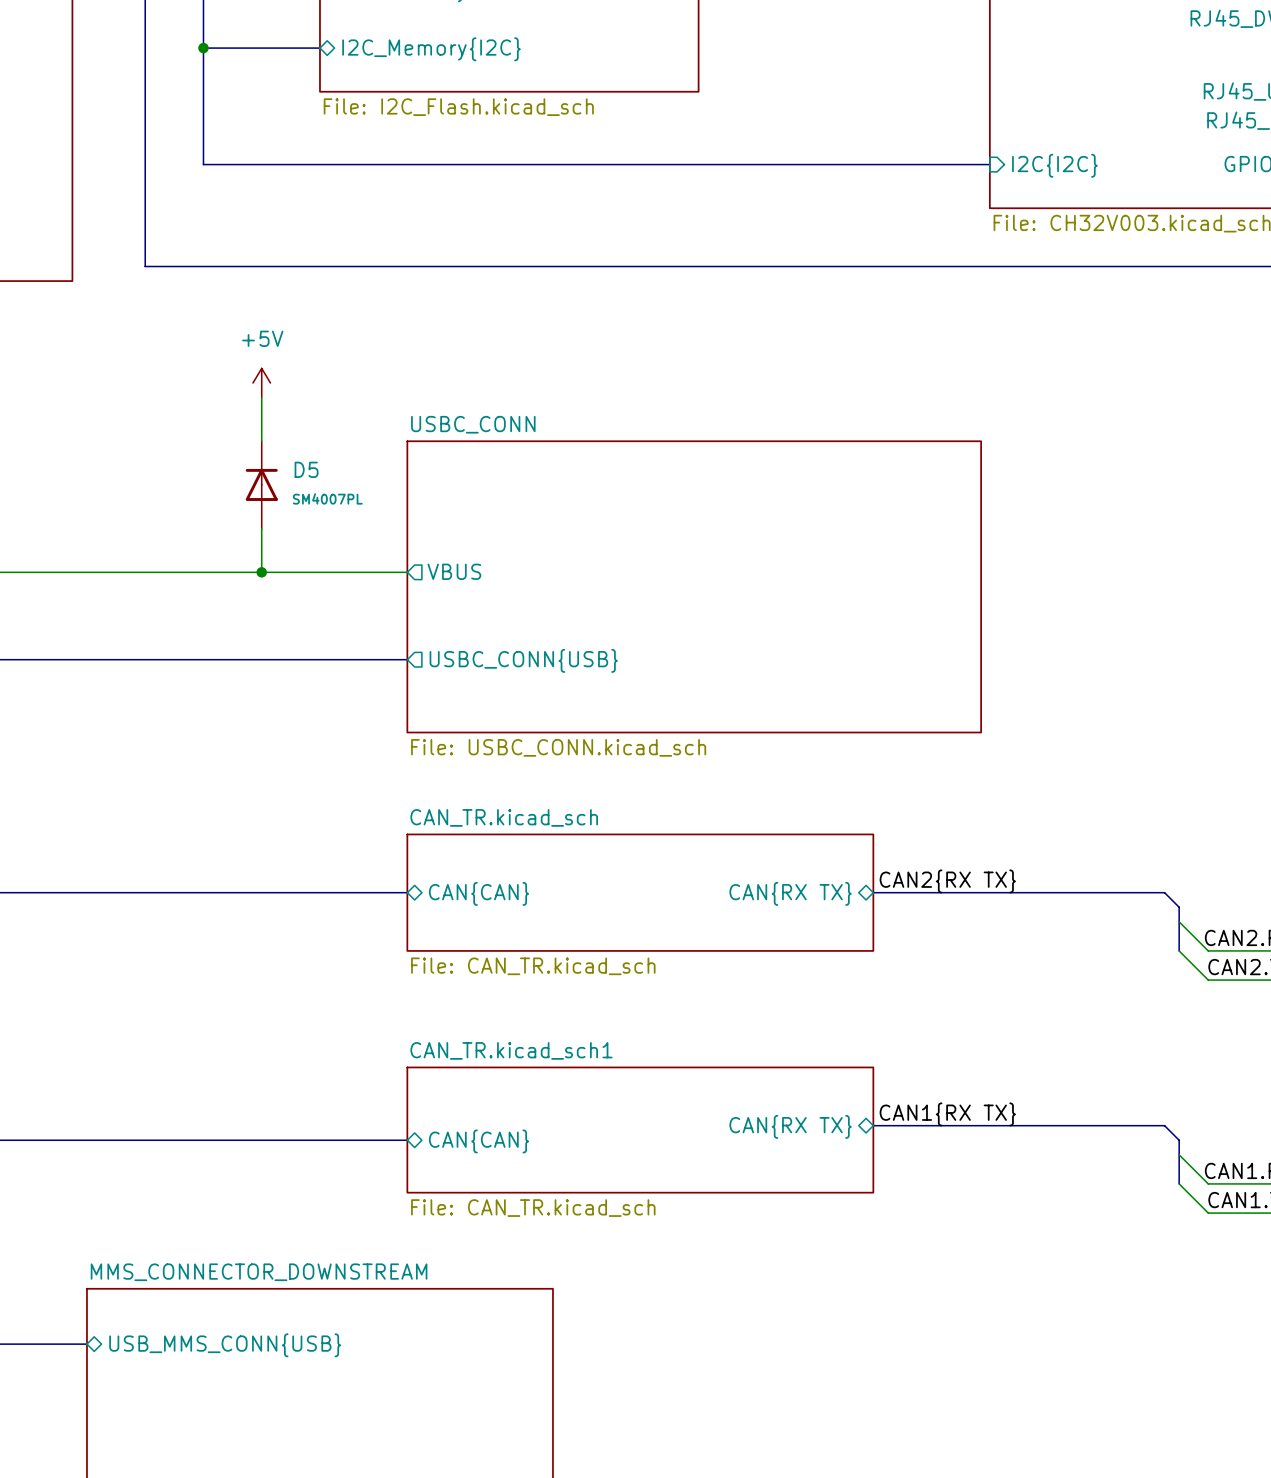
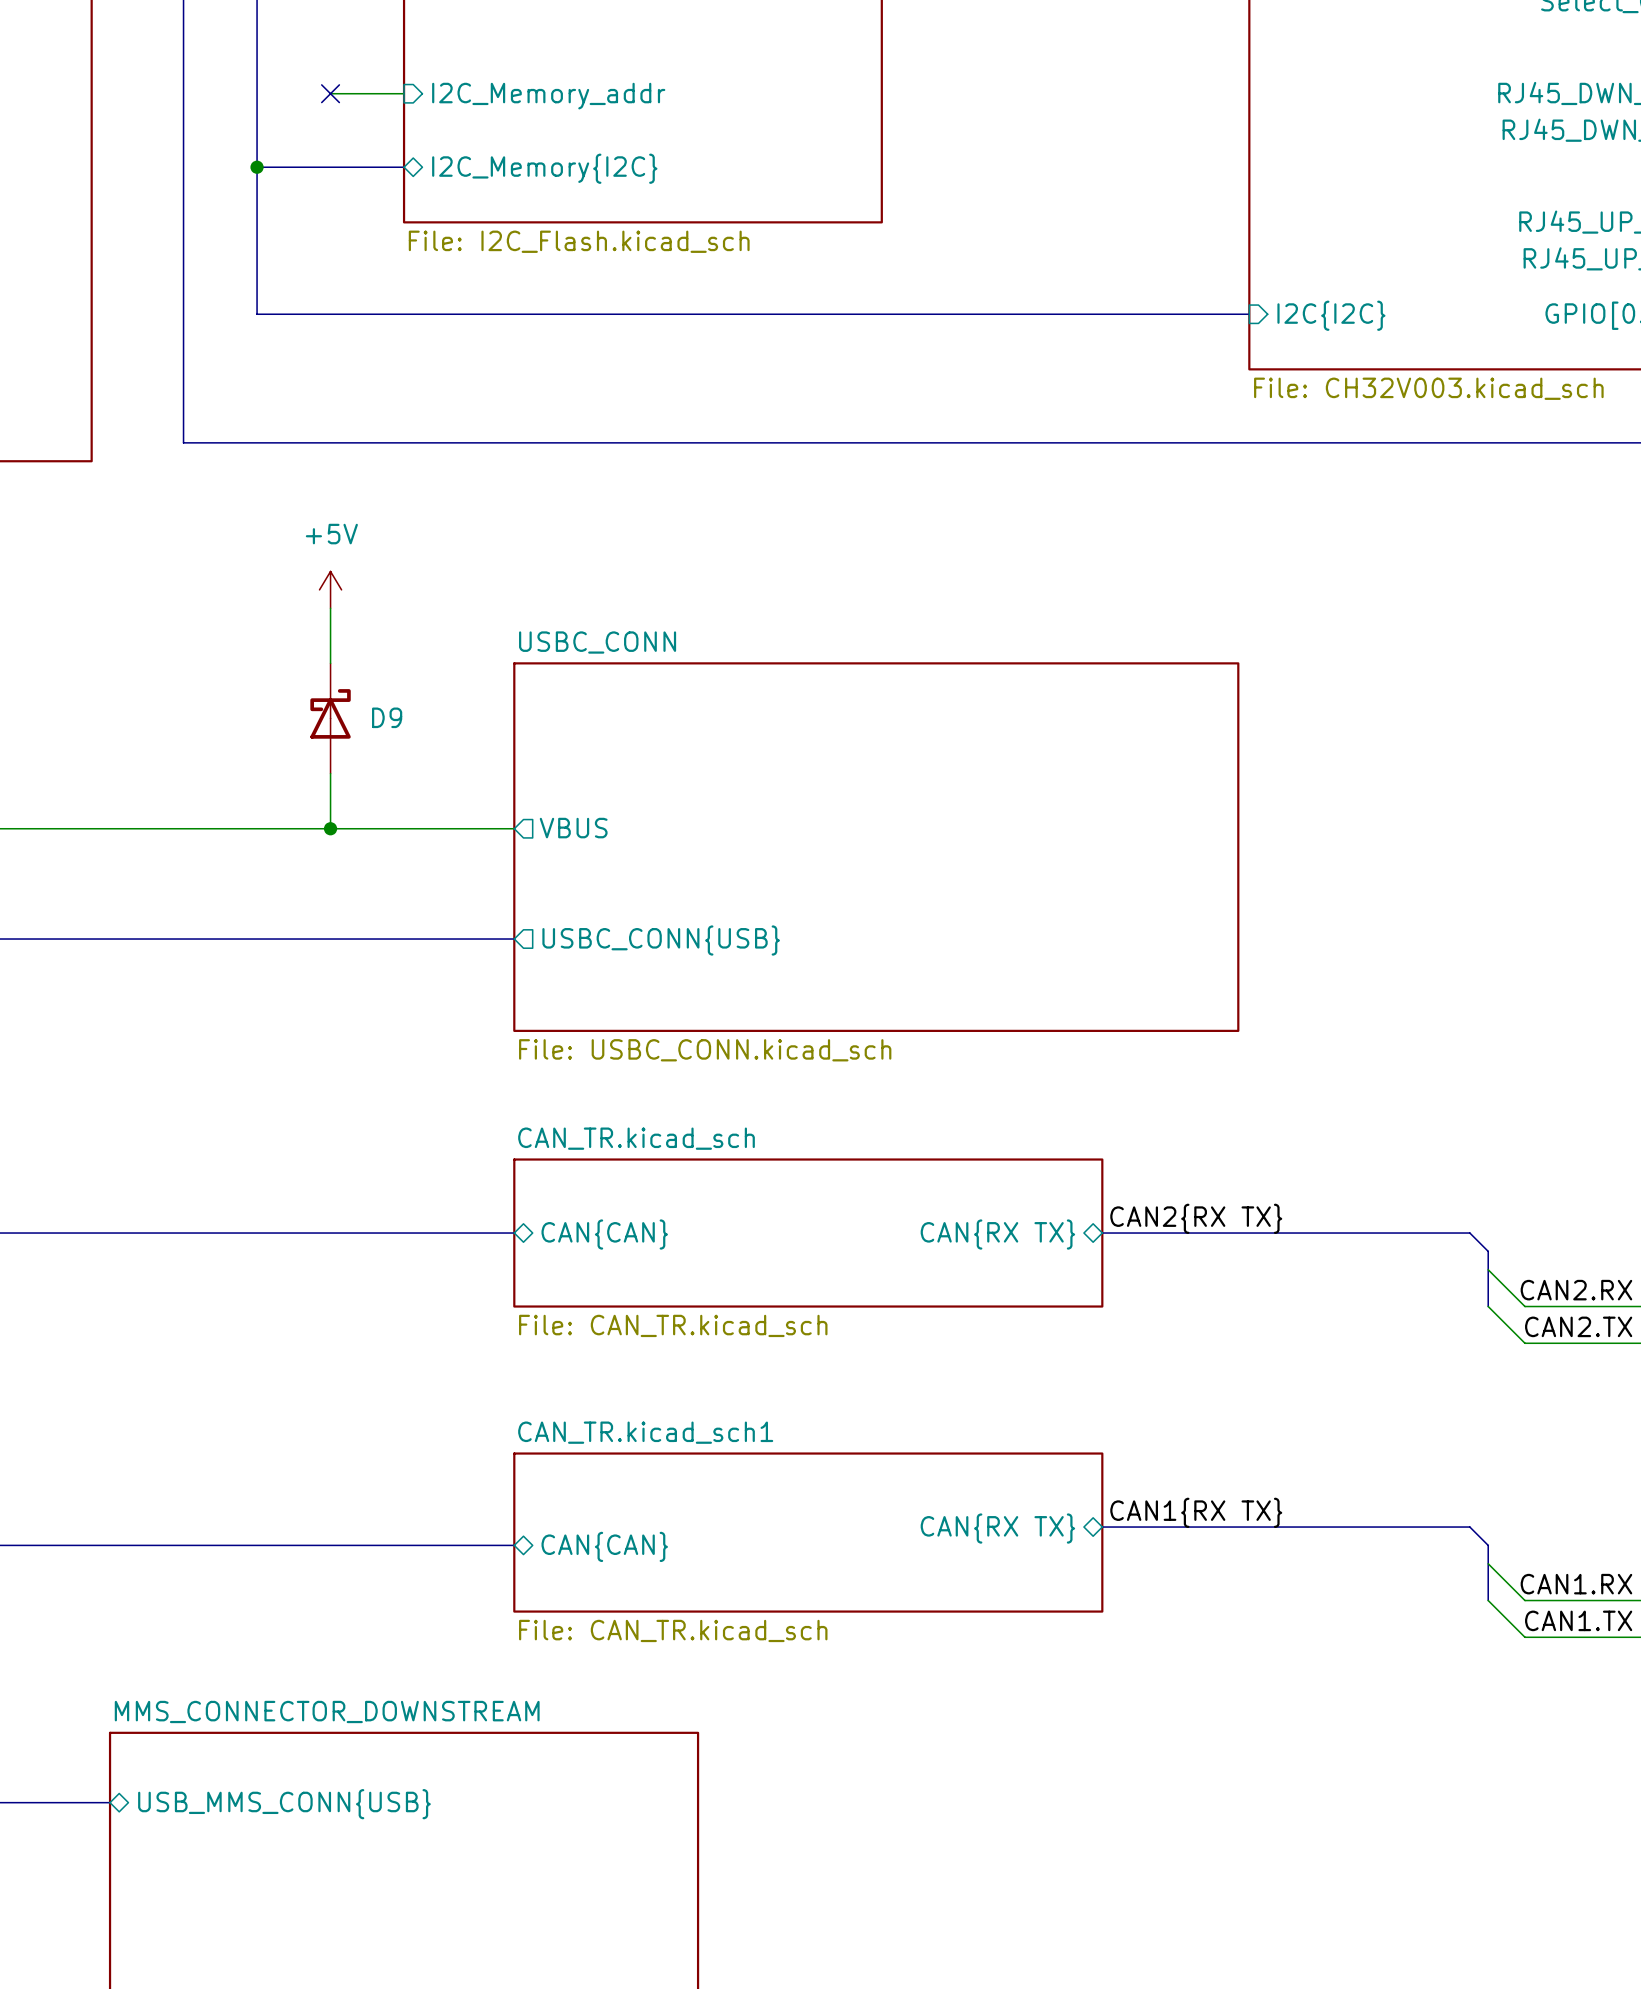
D5: SM4007PL (261, 484) -> none
D9: none -> (330, 718)

